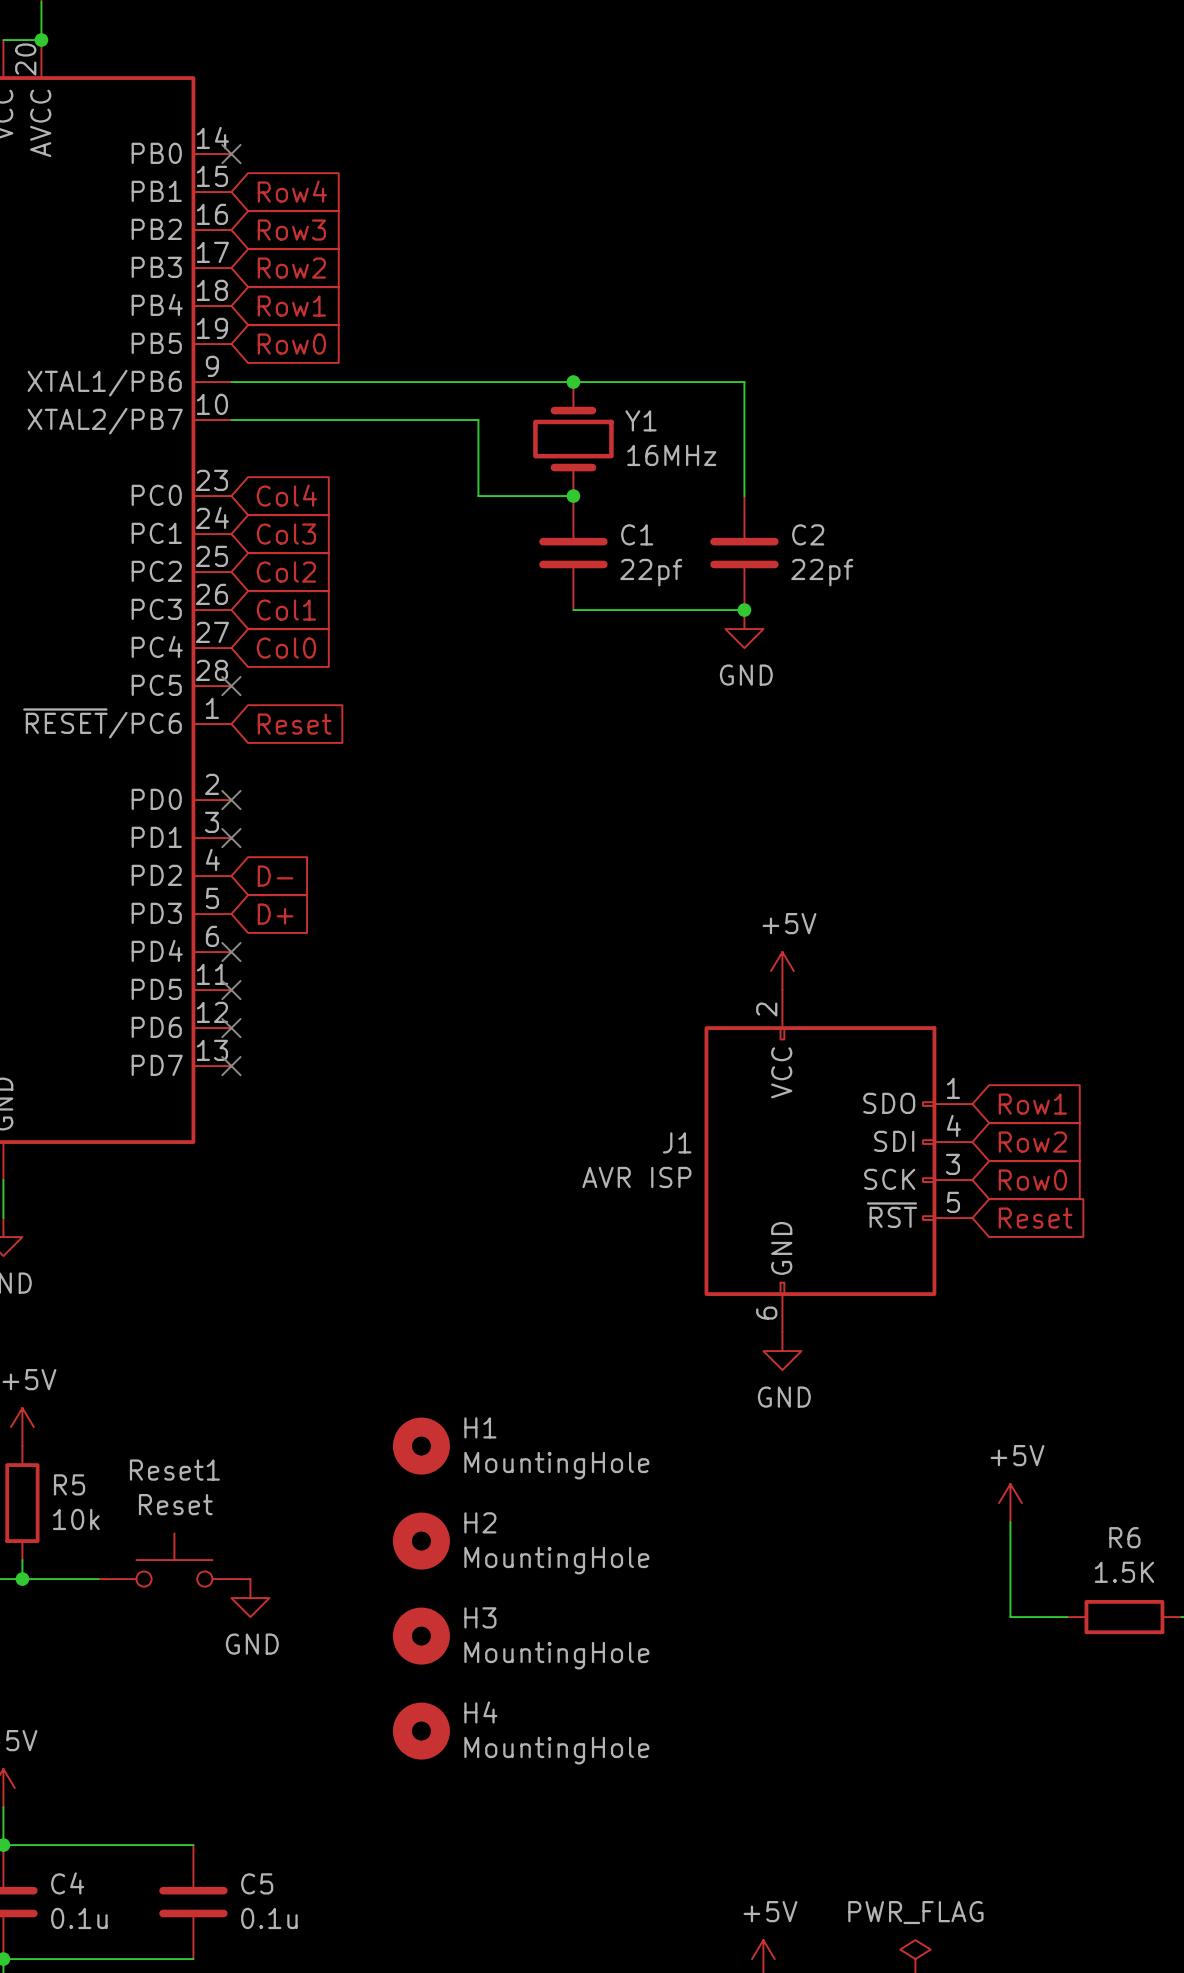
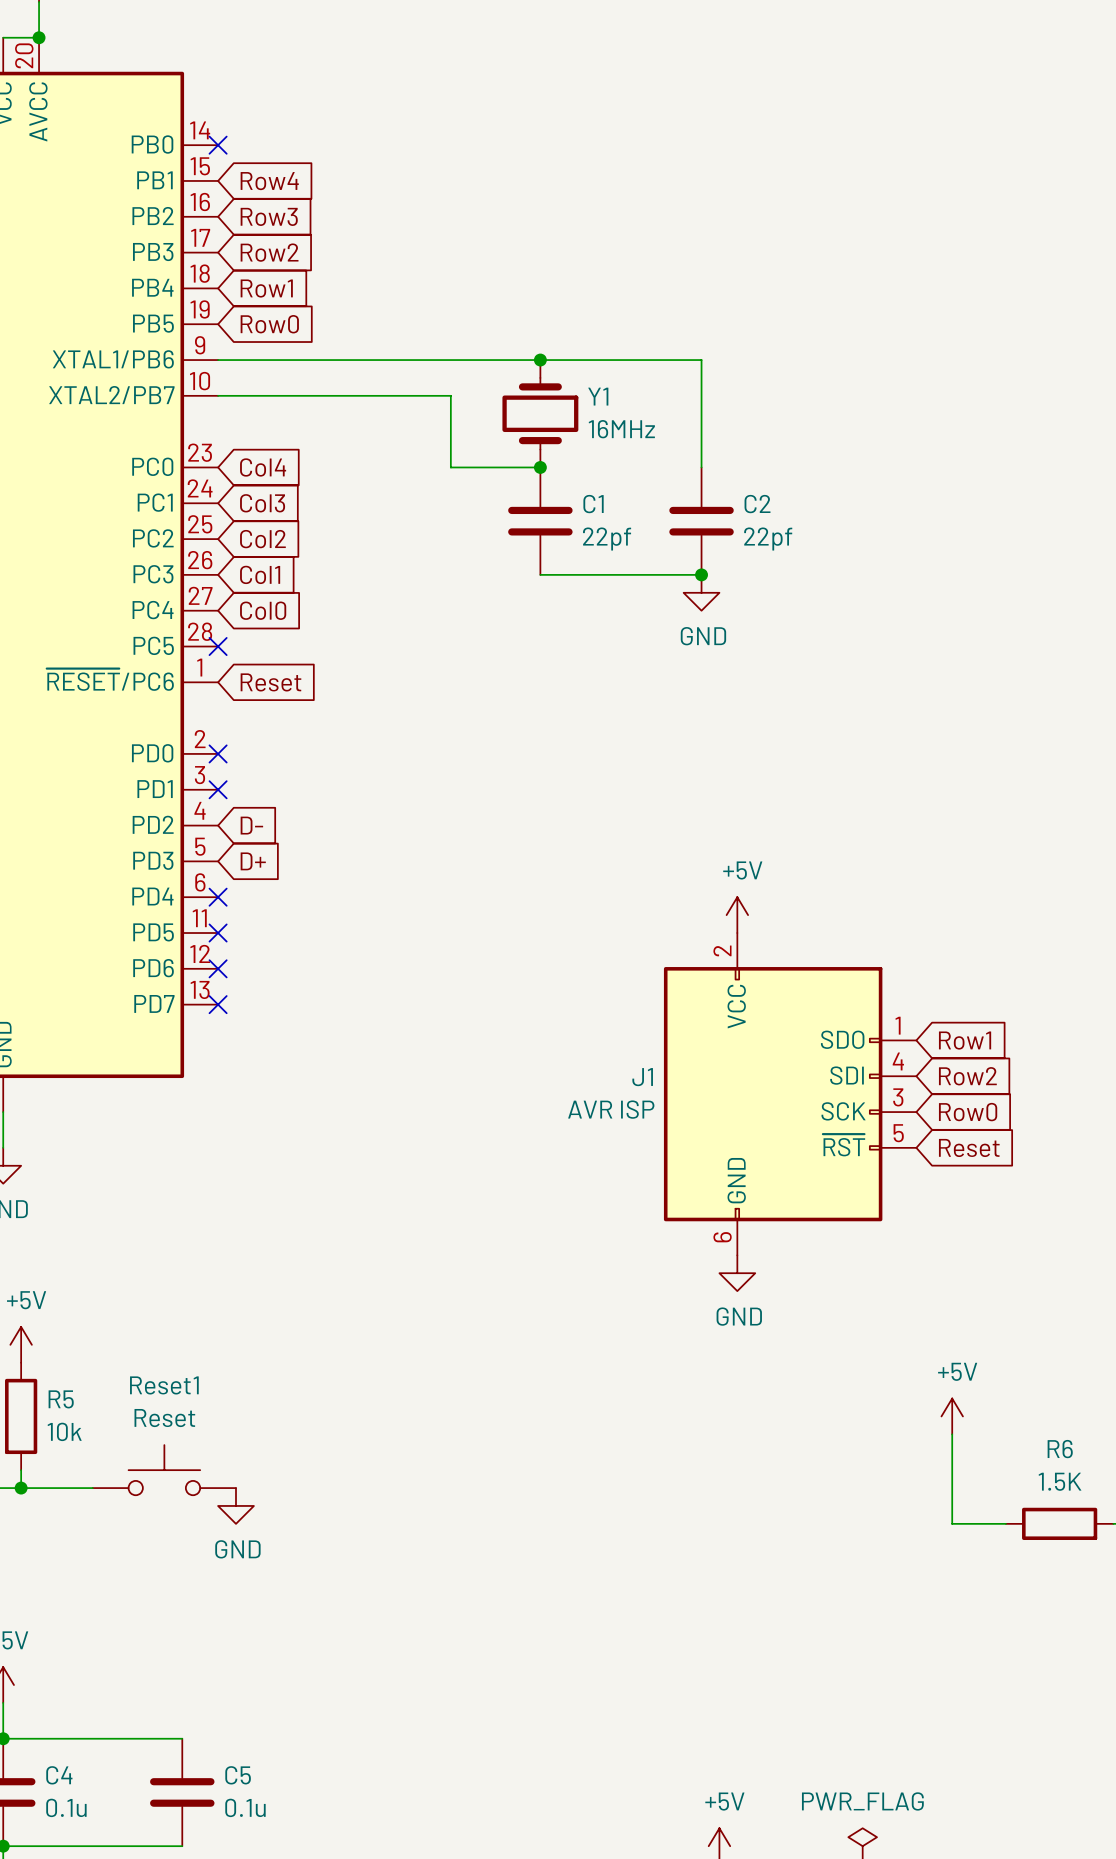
H1: MountingHole (421, 1446) -> none
H2: MountingHole (421, 1541) -> none
H3: MountingHole (421, 1636) -> none
H4: MountingHole (421, 1731) -> none

